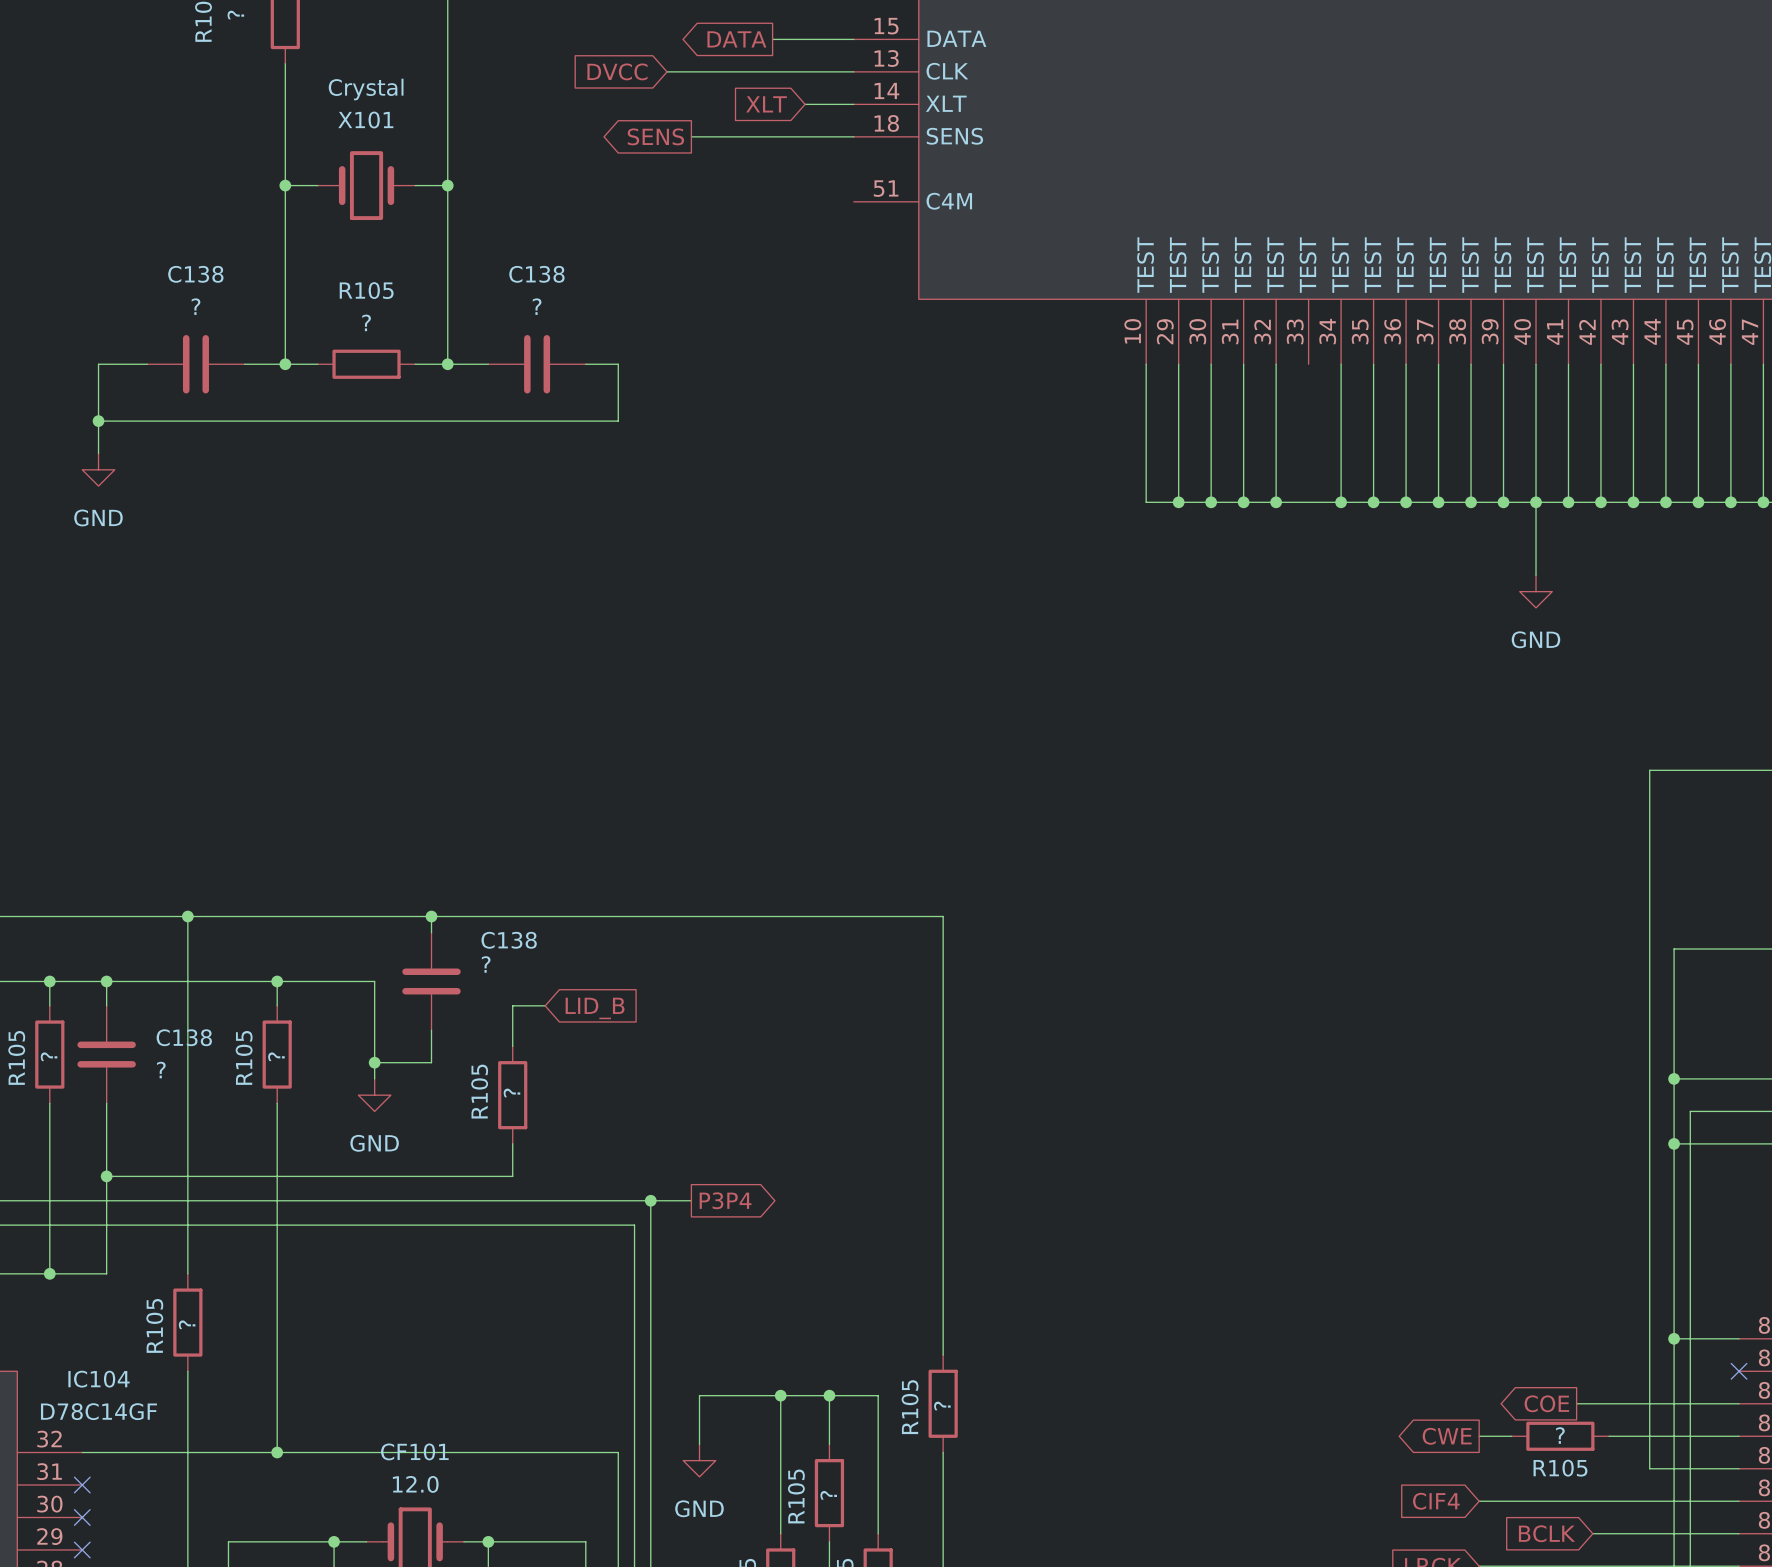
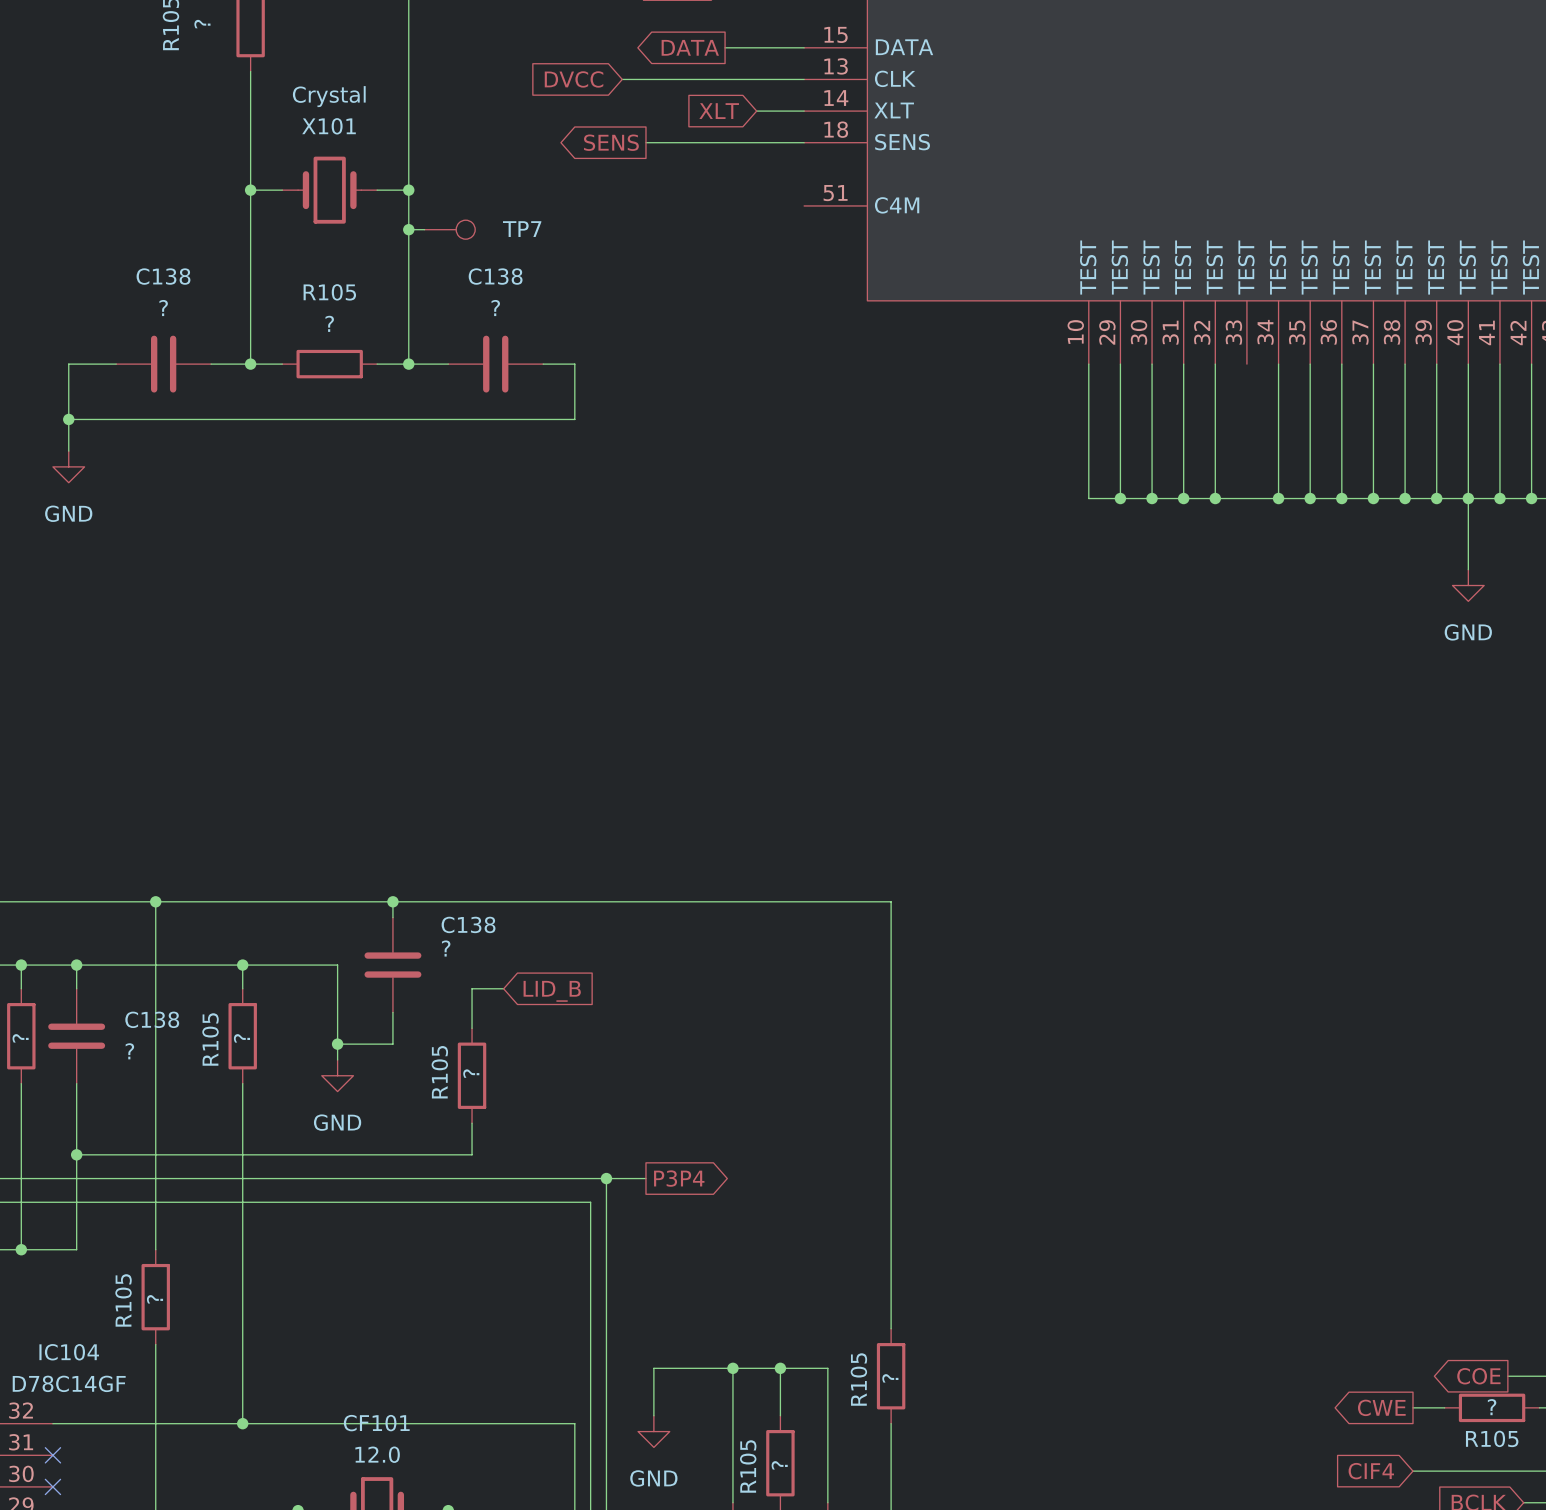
wire: none -> (408, 229) (424, 229)
junction: none -> (408, 229)
TP7: none -> (449, 229)

